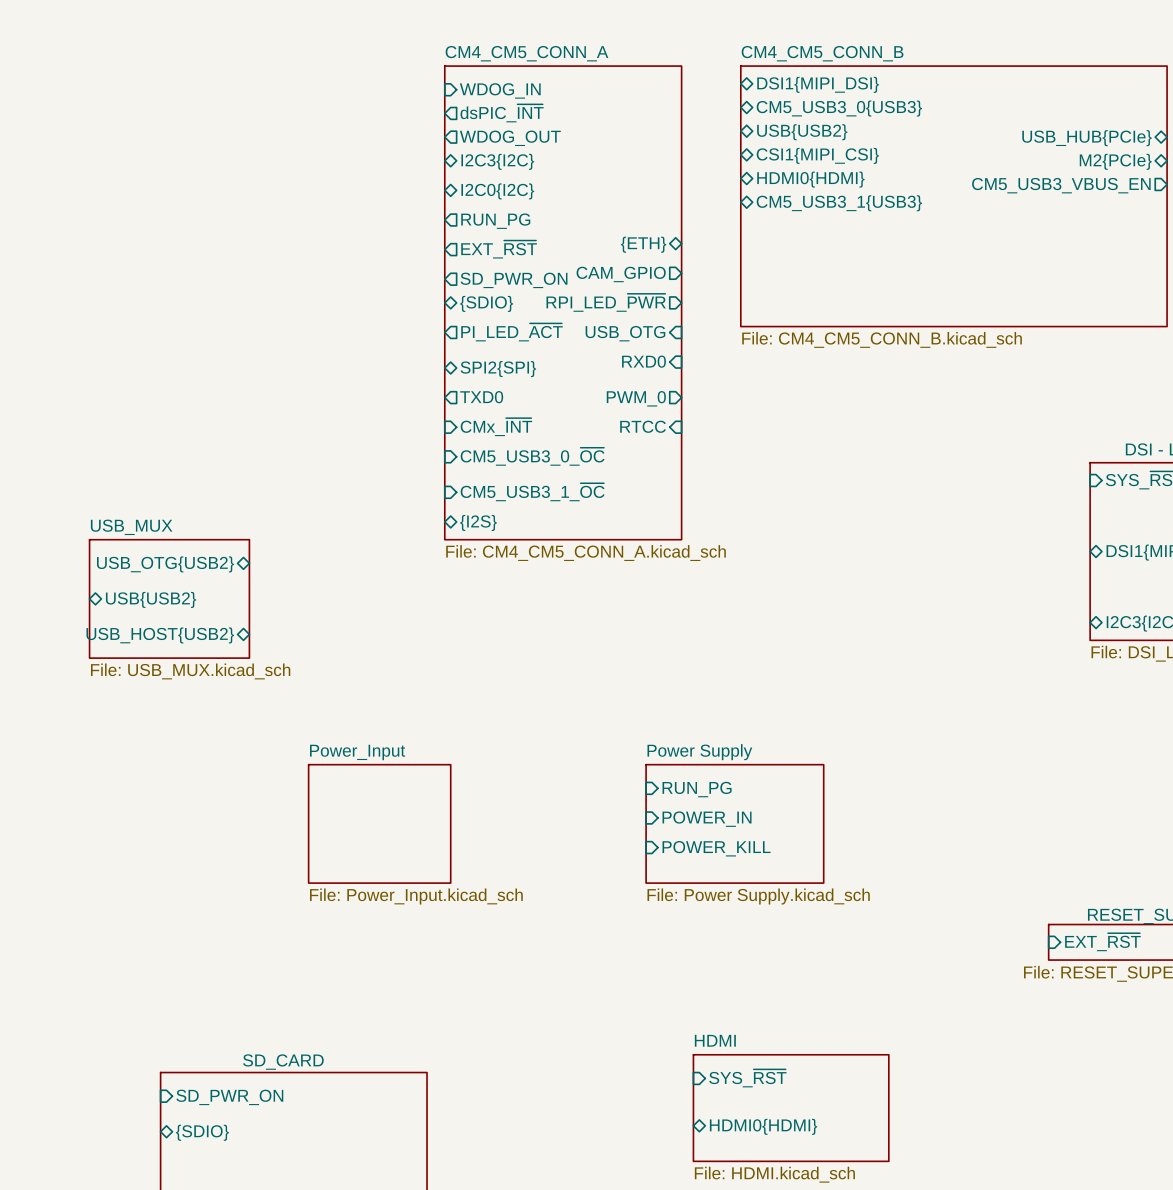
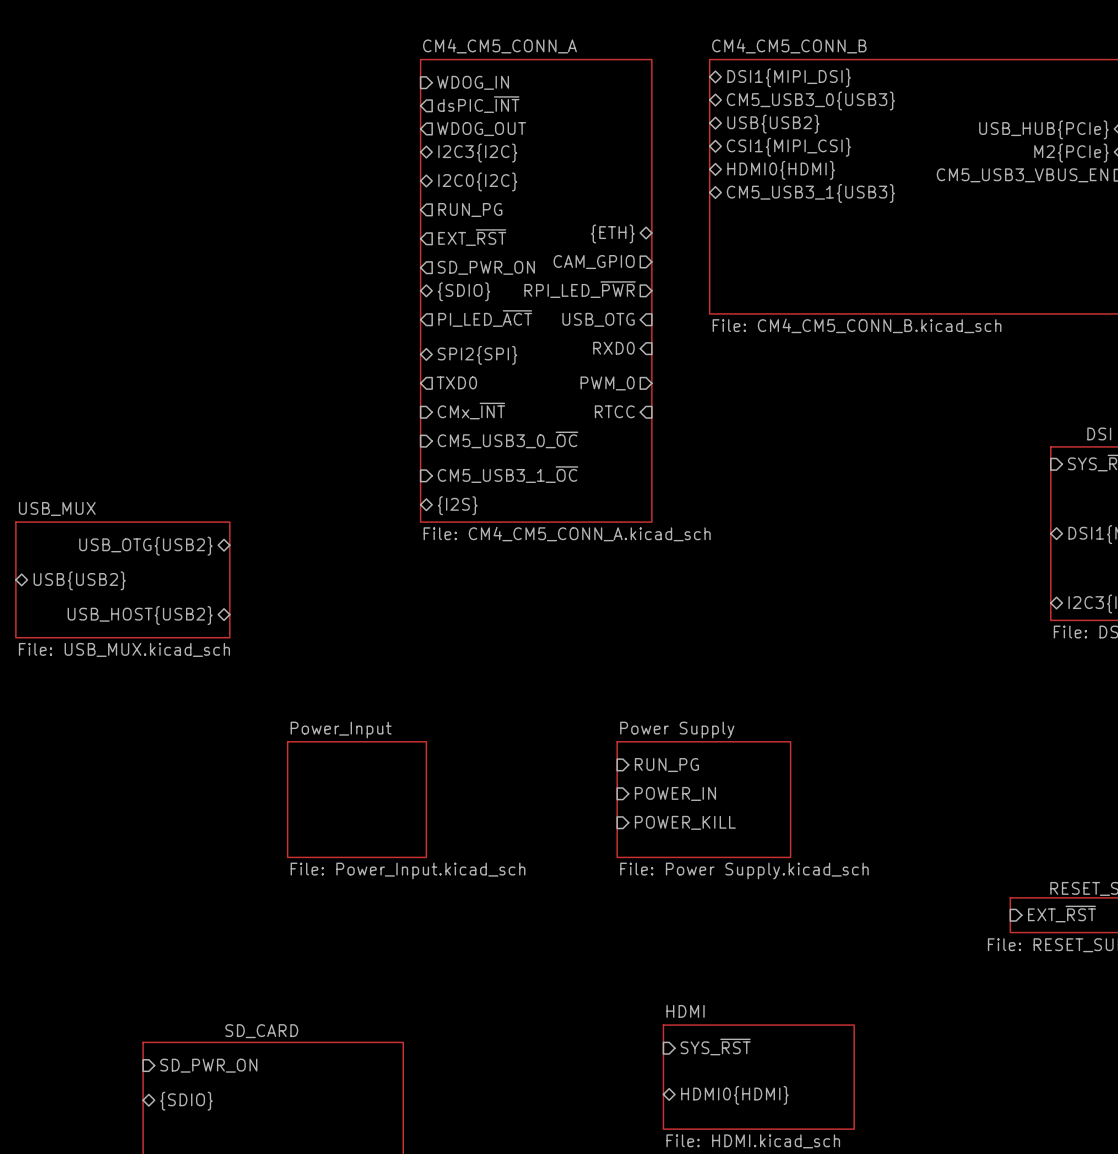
sheet USB_MUX: none -> File: USB_MUX.kicad_sch (122, 579)
sheet USB_MUX: File: USB_MUX.kicad_sch (169, 598) -> none
sheet pin position: USB{USB2} (151, 599) -> USB{USB2} (79, 580)

